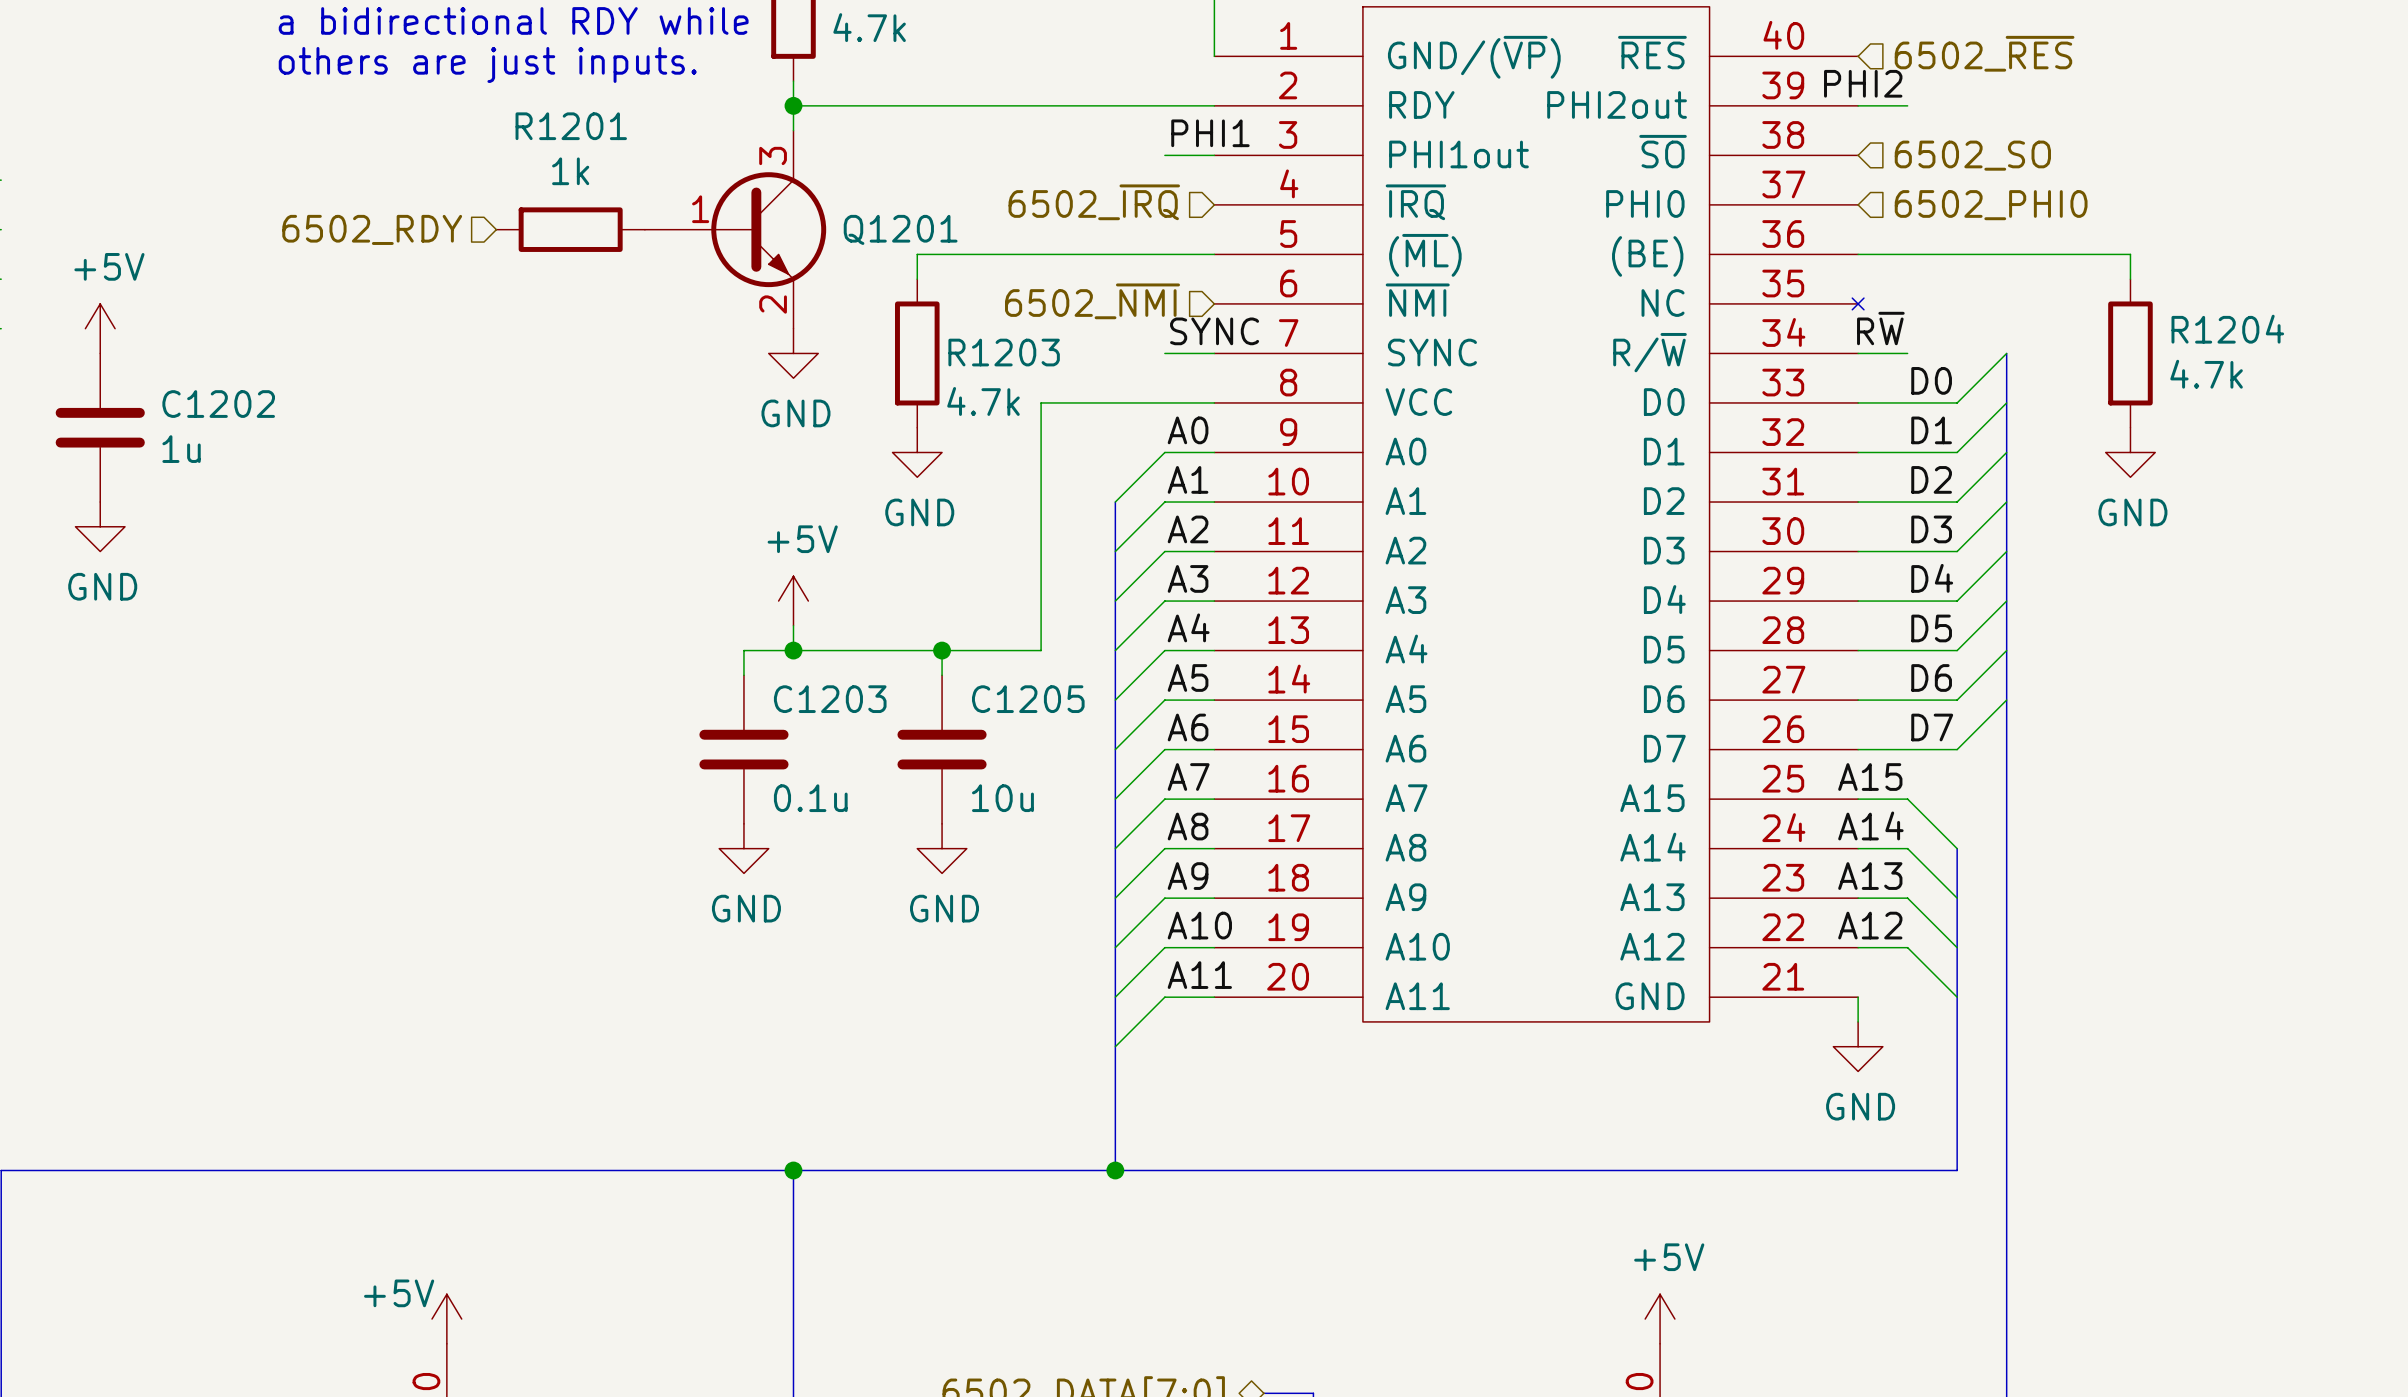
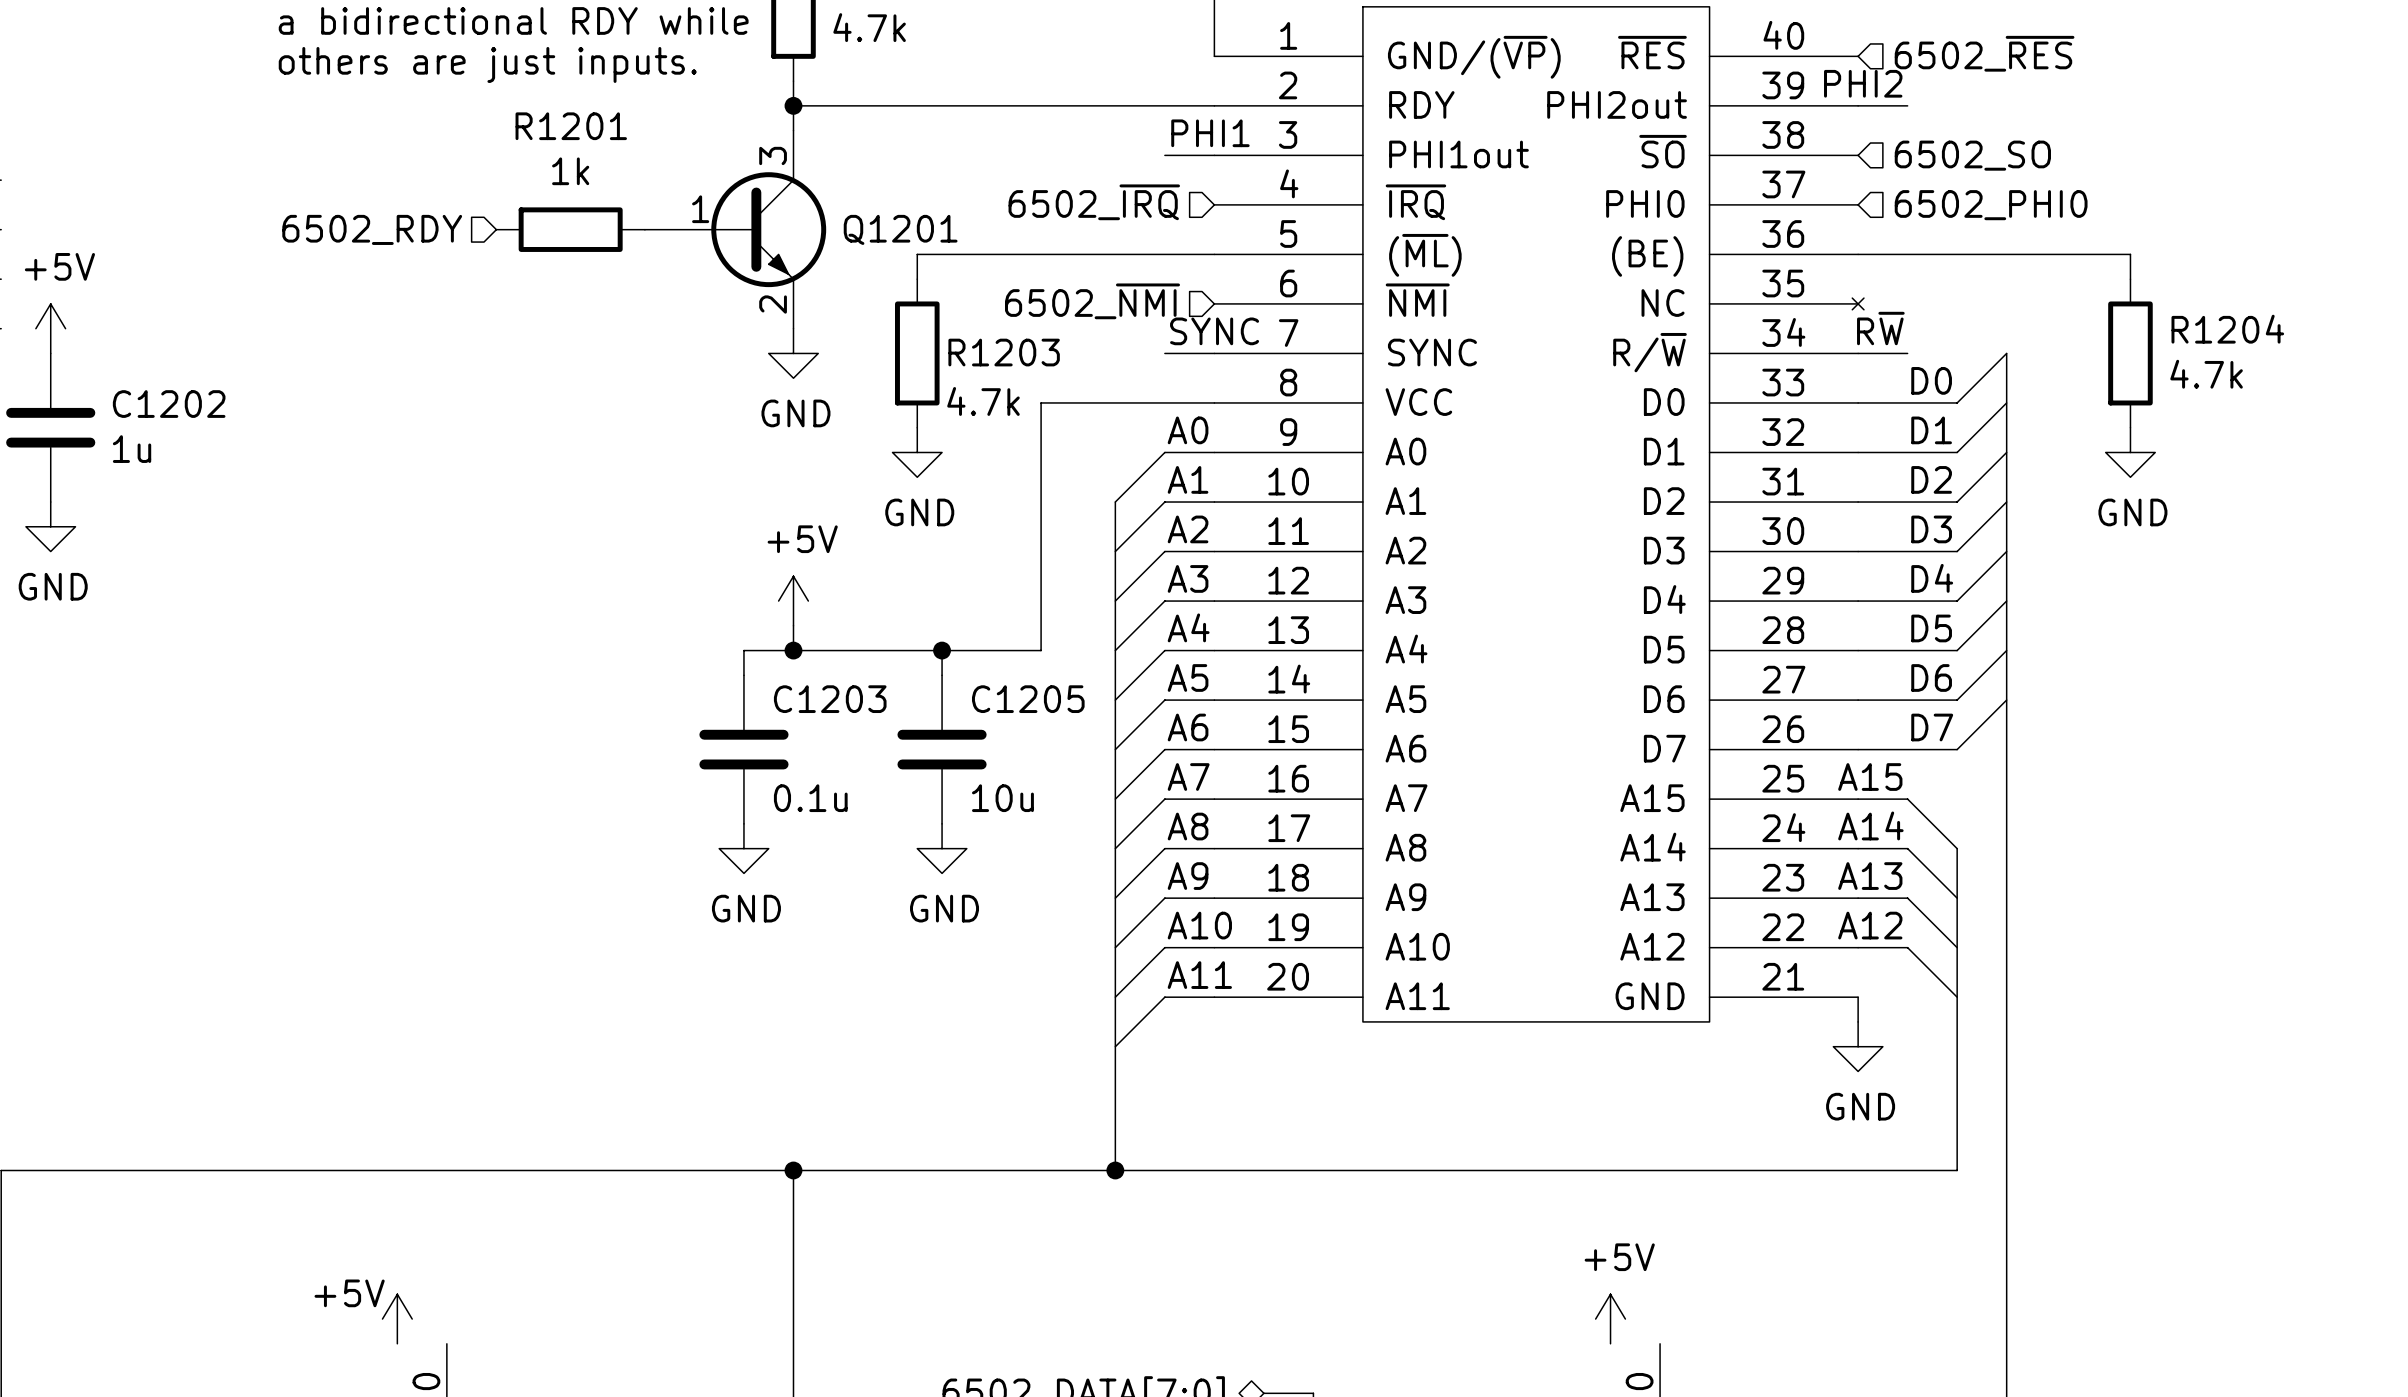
power symbol position: +5V (100, 328) -> +5V (50, 328)
C1202 position: (100, 427) -> (50, 427)
power symbol position: GND (100, 526) -> GND (50, 526)
power symbol position: +5V (446, 1319) -> +5V (397, 1319)
power symbol position: +5V (1660, 1319) -> +5V (1610, 1319)

